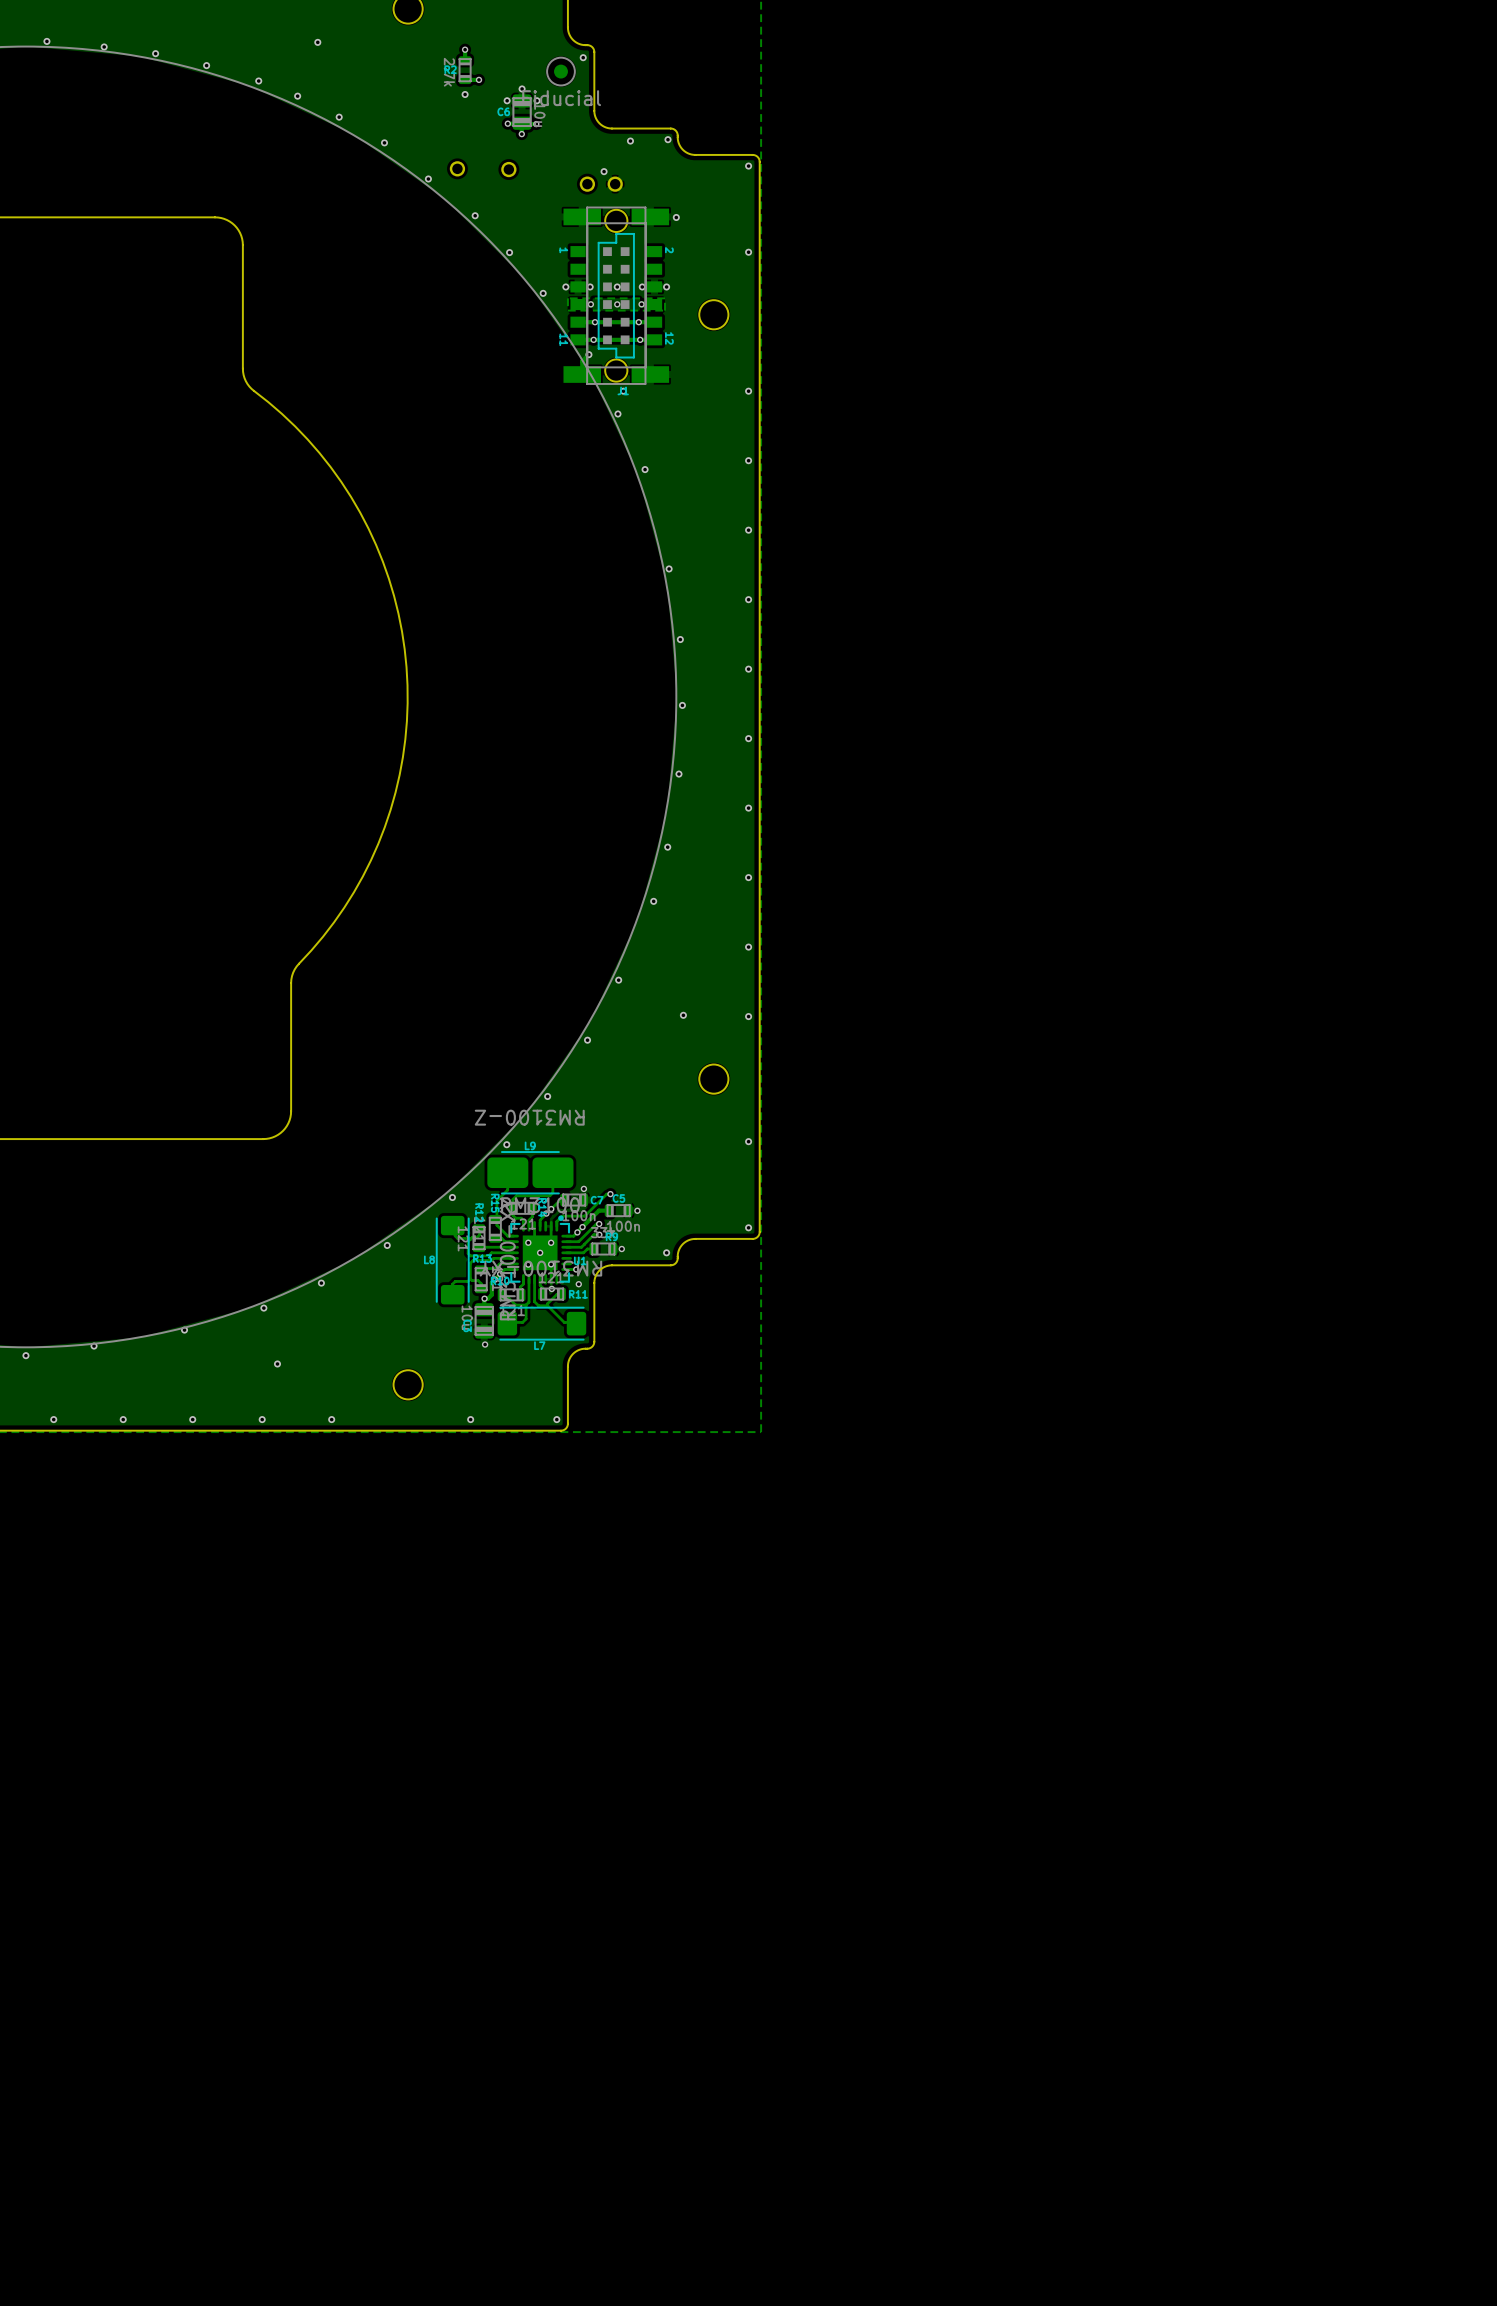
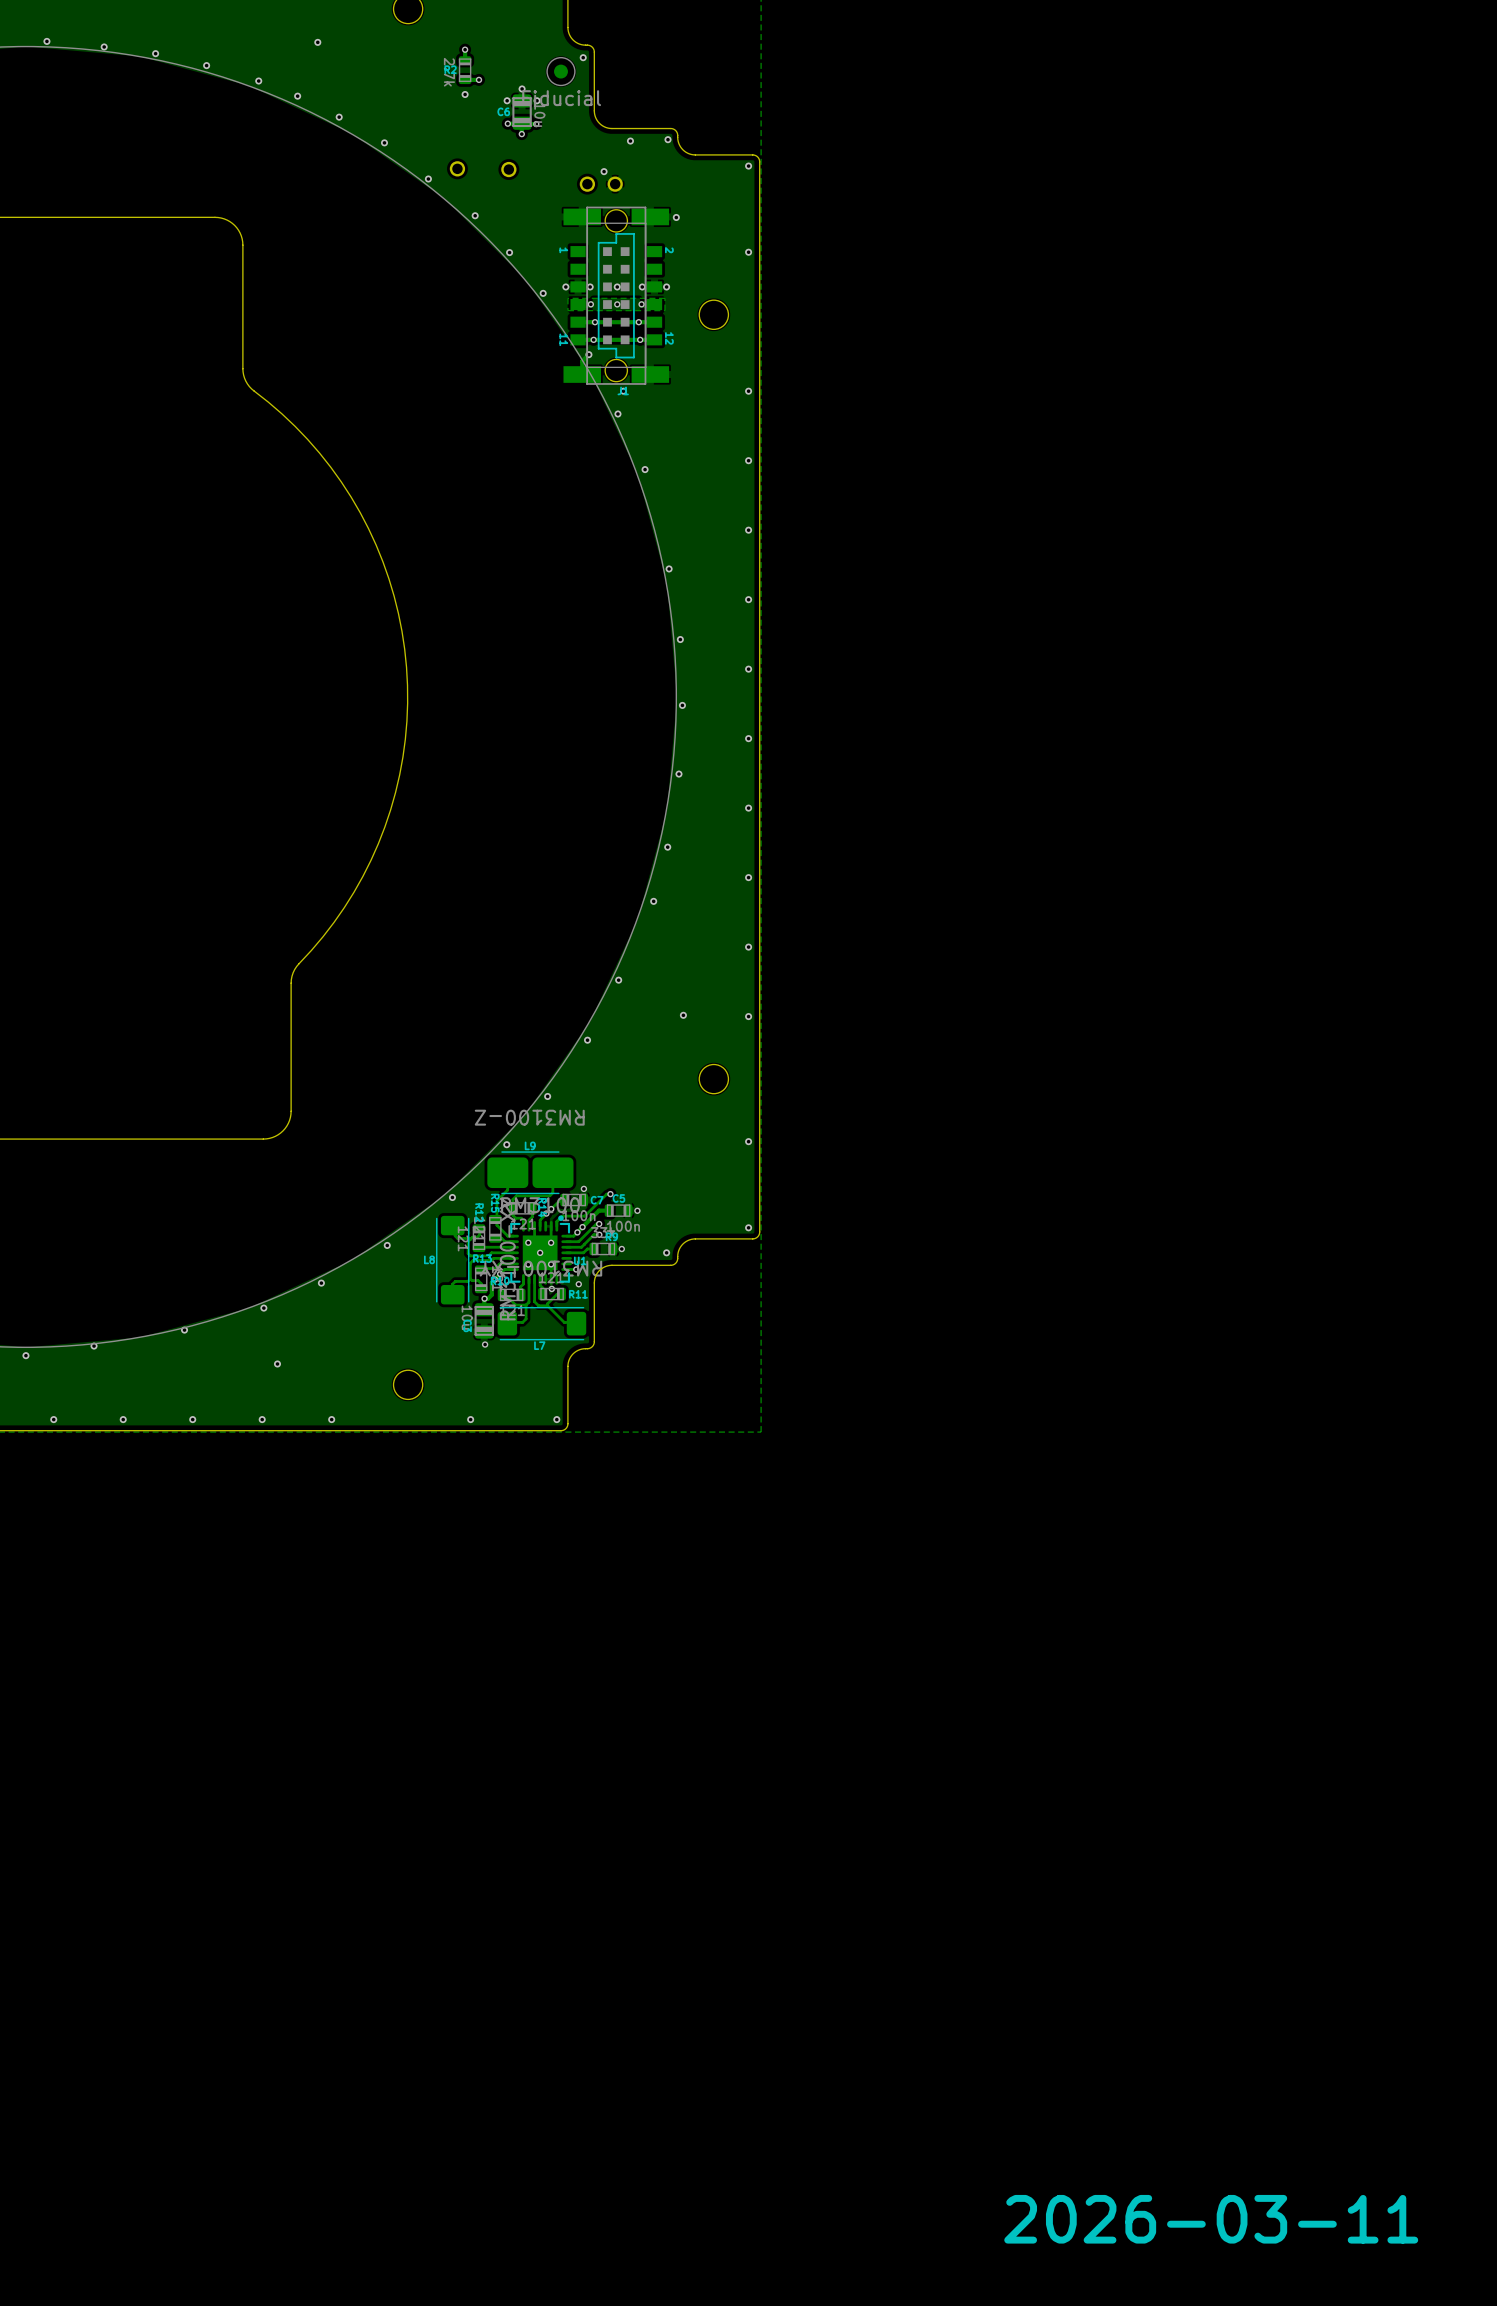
text: none -> 2026-03-11 (1211, 2219)

